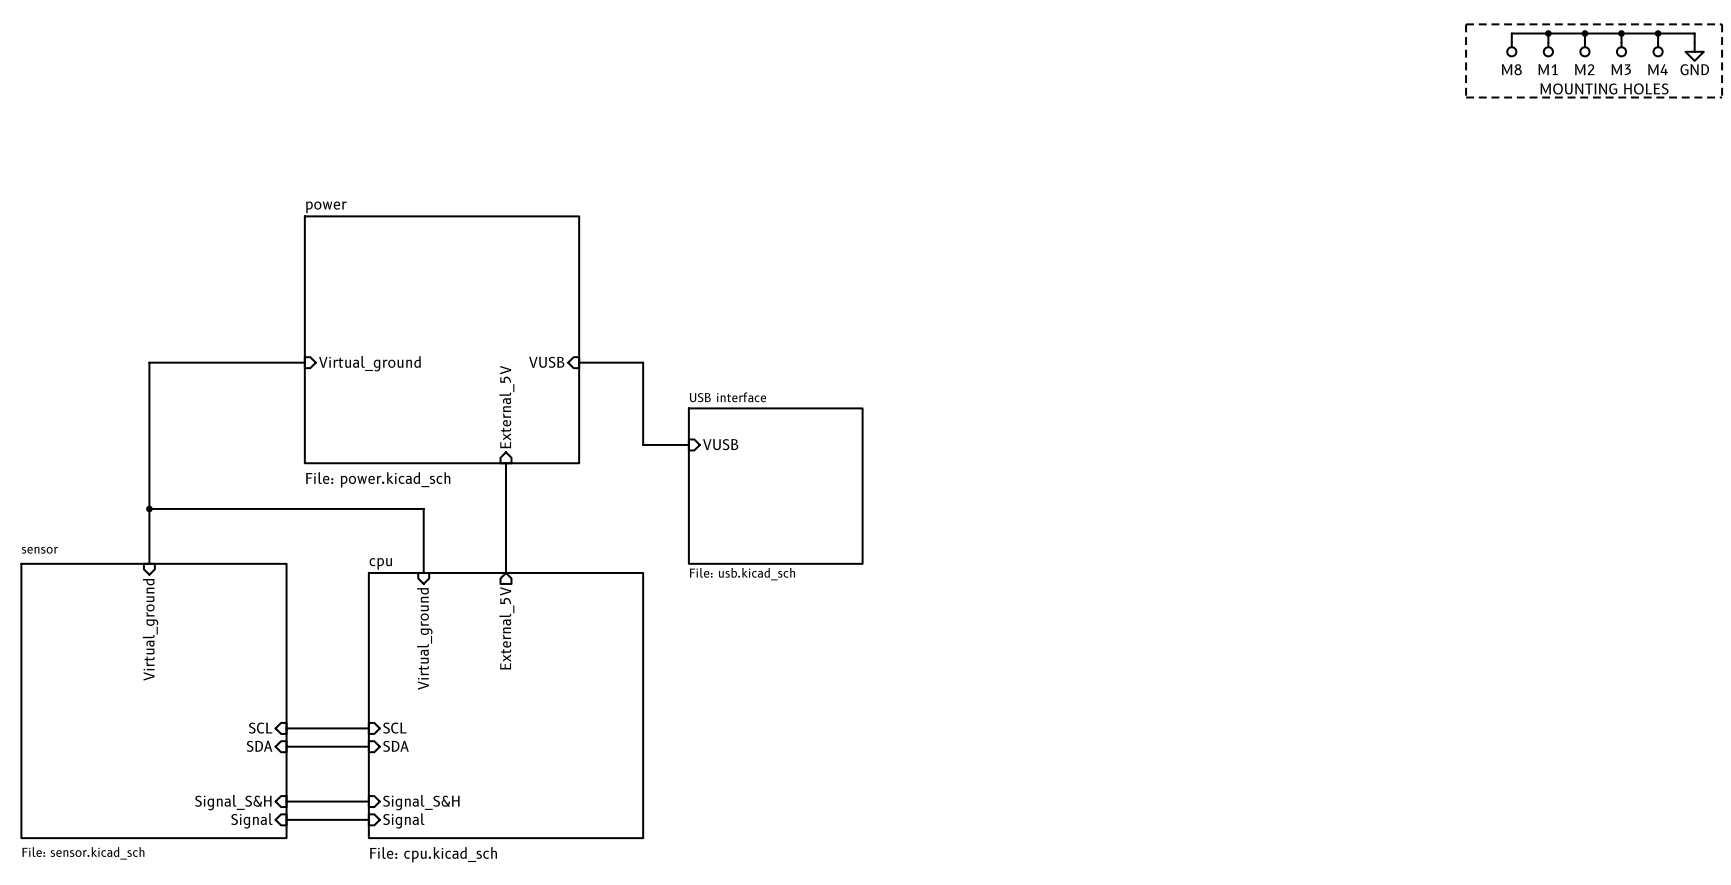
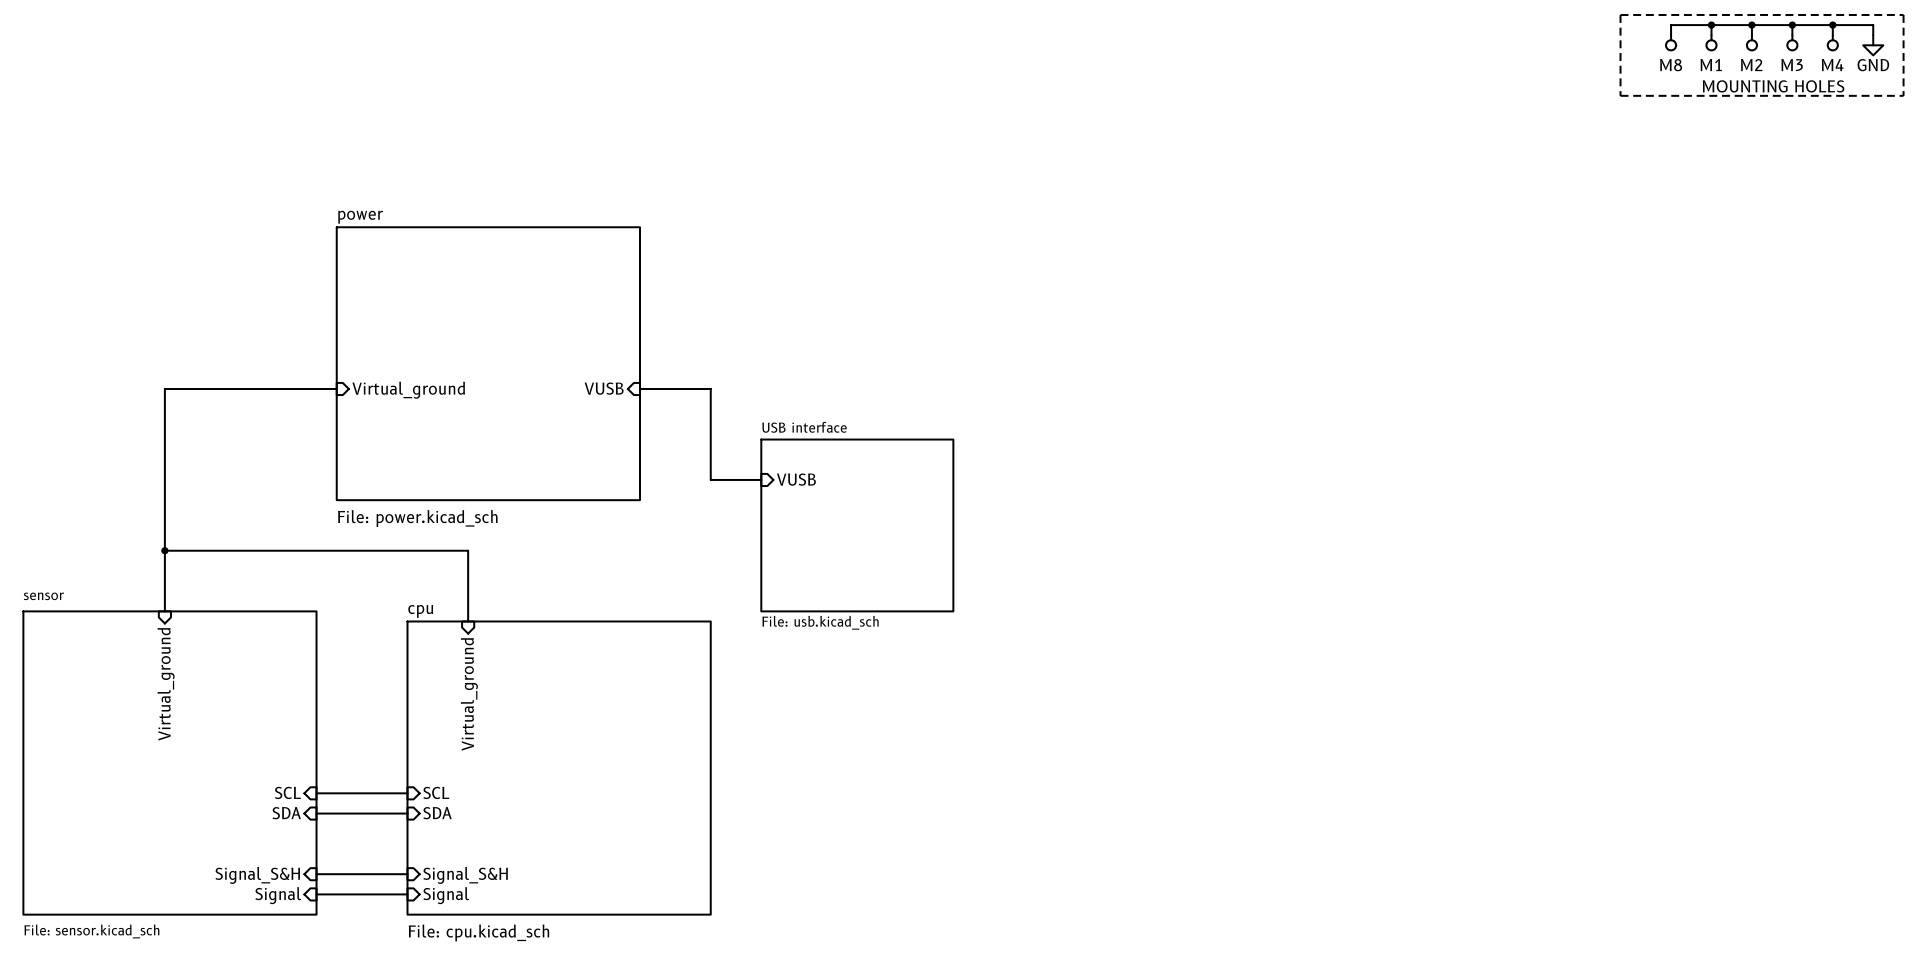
sheet pin: External_5V (506, 407) -> none
wire: (506, 463) (506, 572) -> none
sheet pin: External_5V (506, 628) -> none

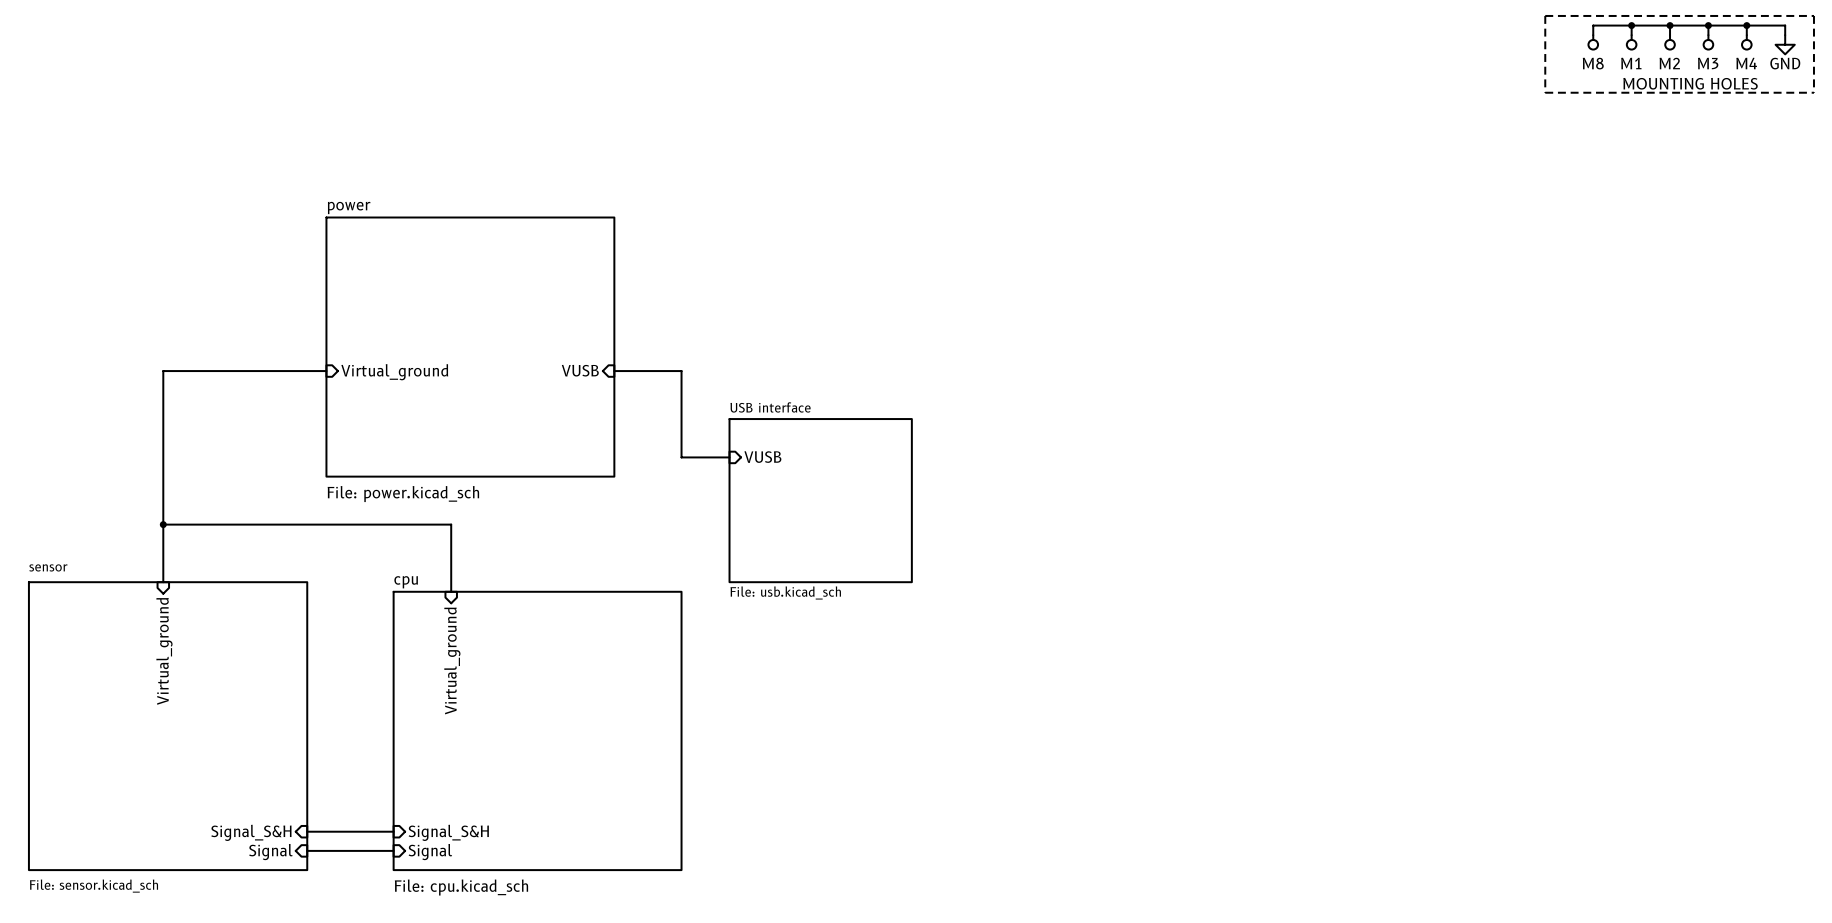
sheet pin: SCL (287, 792) -> none
sheet pin: SCL (436, 792) -> none
wire: (316, 793) (407, 793) -> none
sheet pin: SDA (286, 813) -> none
wire: (316, 813) (407, 813) -> none
sheet pin: SDA (437, 813) -> none

